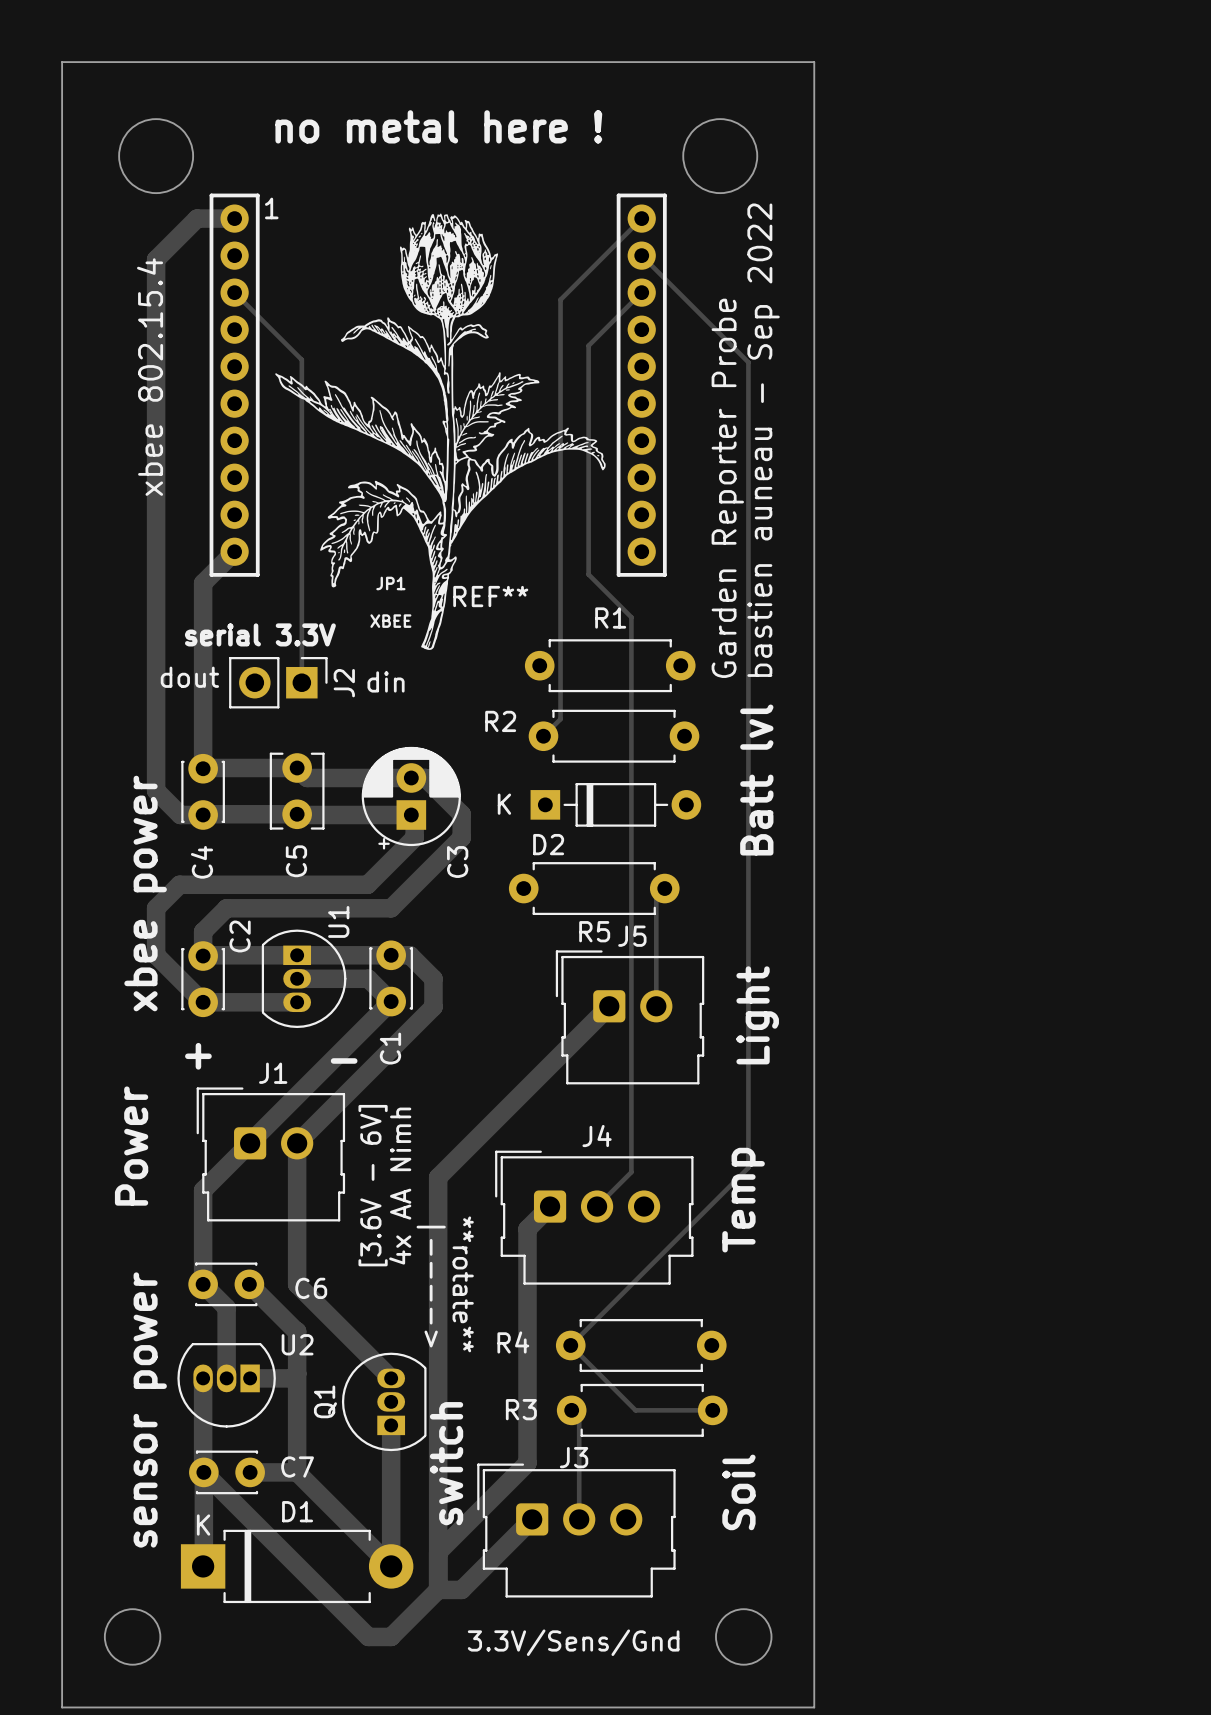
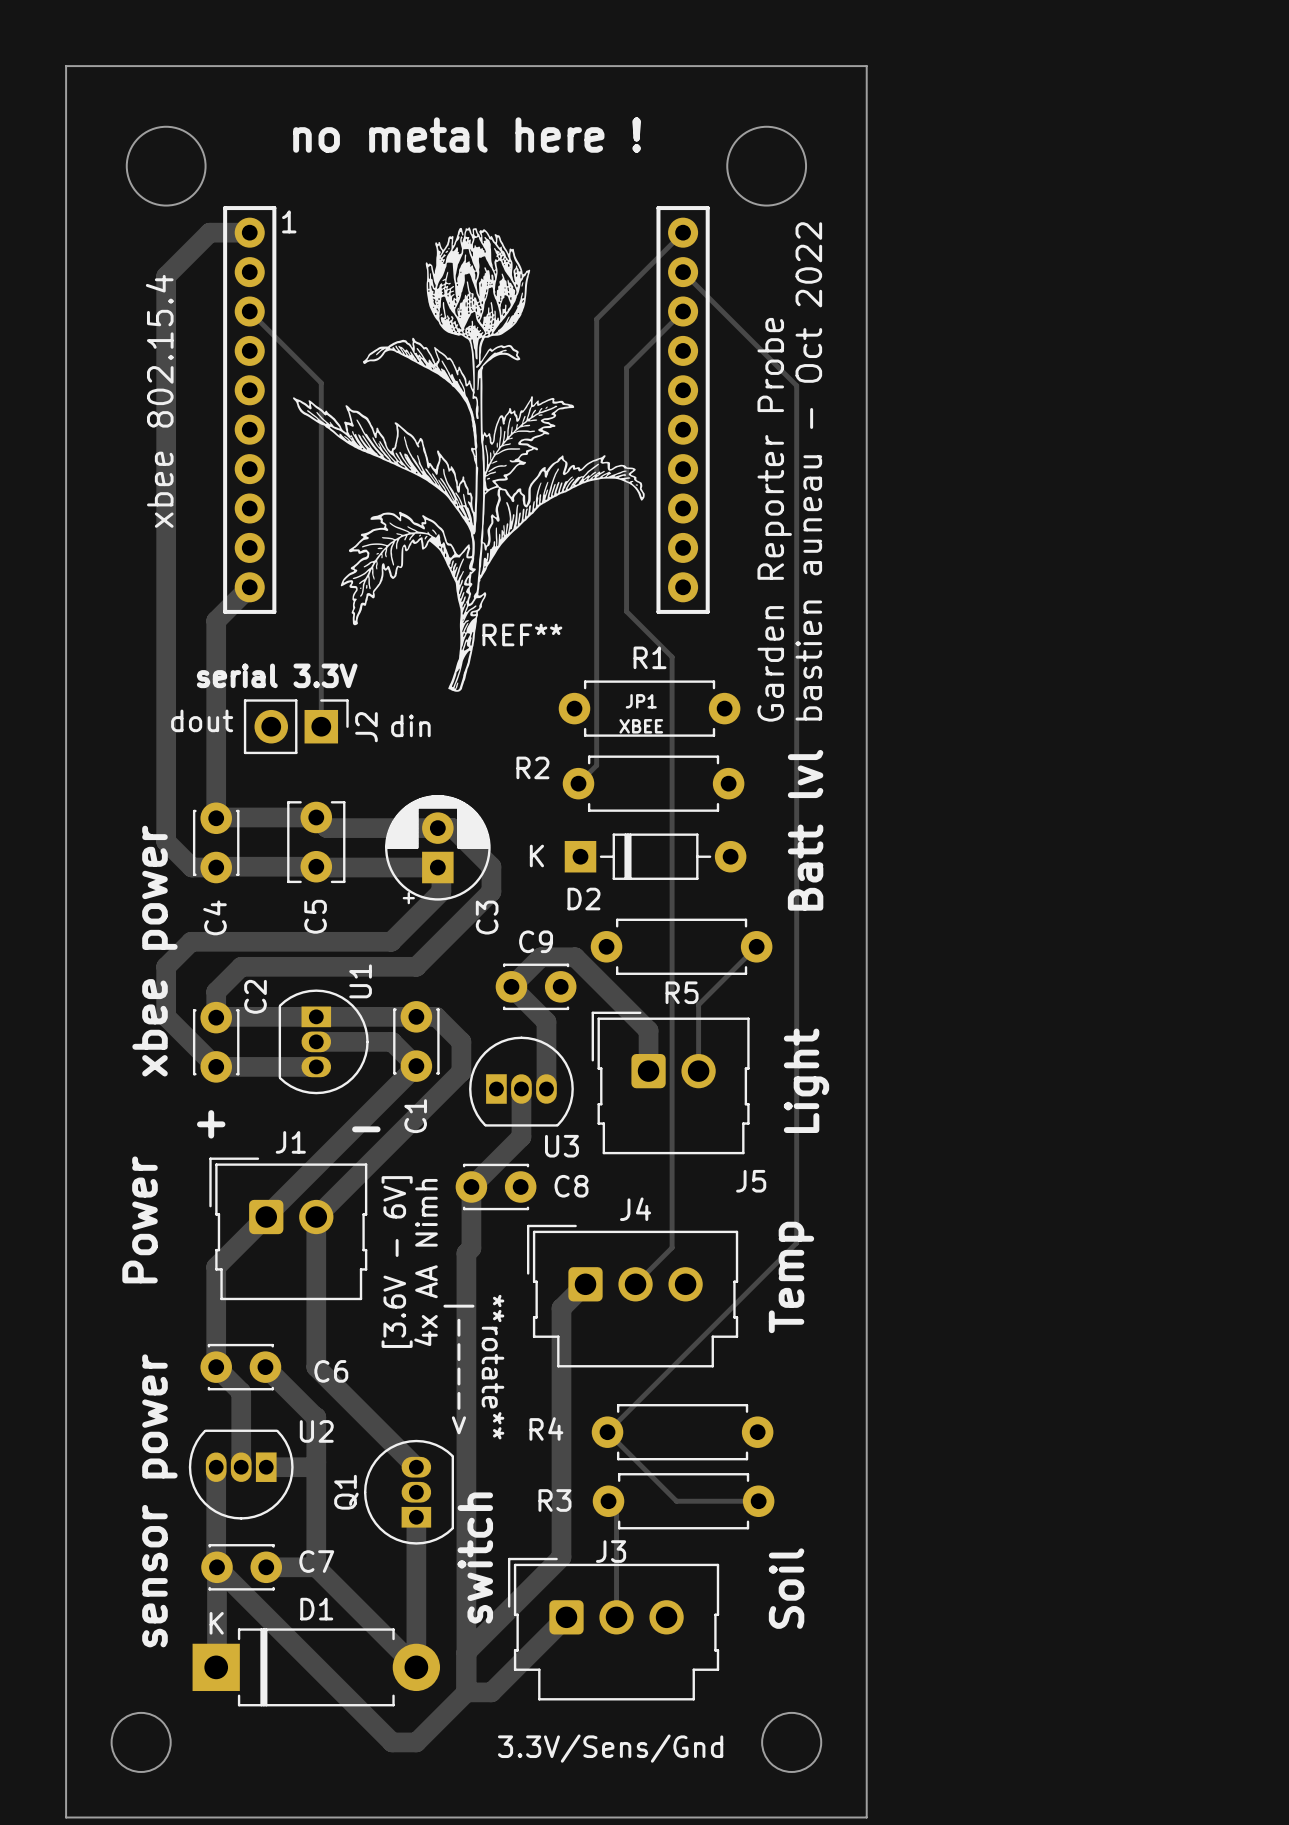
text: bastien auneau - Sep 2022 (763, 440) -> bastien auneau - Oct 2022 (808, 471)
JP1 name position: JP1 (390, 583) -> JP1 (641, 701)
JP1 value position: XBEE (390, 621) -> XBEE (641, 726)
R5 position: (594, 888) -> (681, 946)
track: (664, 888) (656, 897) (656, 944) -> (756, 946) (698, 1004)
C9: none -> (536, 986)
J5 name position: J5 (632, 936) -> J5 (751, 1181)
track: (609, 1006) (442, 1172) -> (521, 1089) (521, 1136) (471, 1186) (471, 1248)
track: none -> (648, 1071) (648, 1030) (575, 957) (541, 957) (511, 986) (546, 1021) (546, 1089)
U3: none -> (521, 1081)
C8: none -> (496, 1186)

